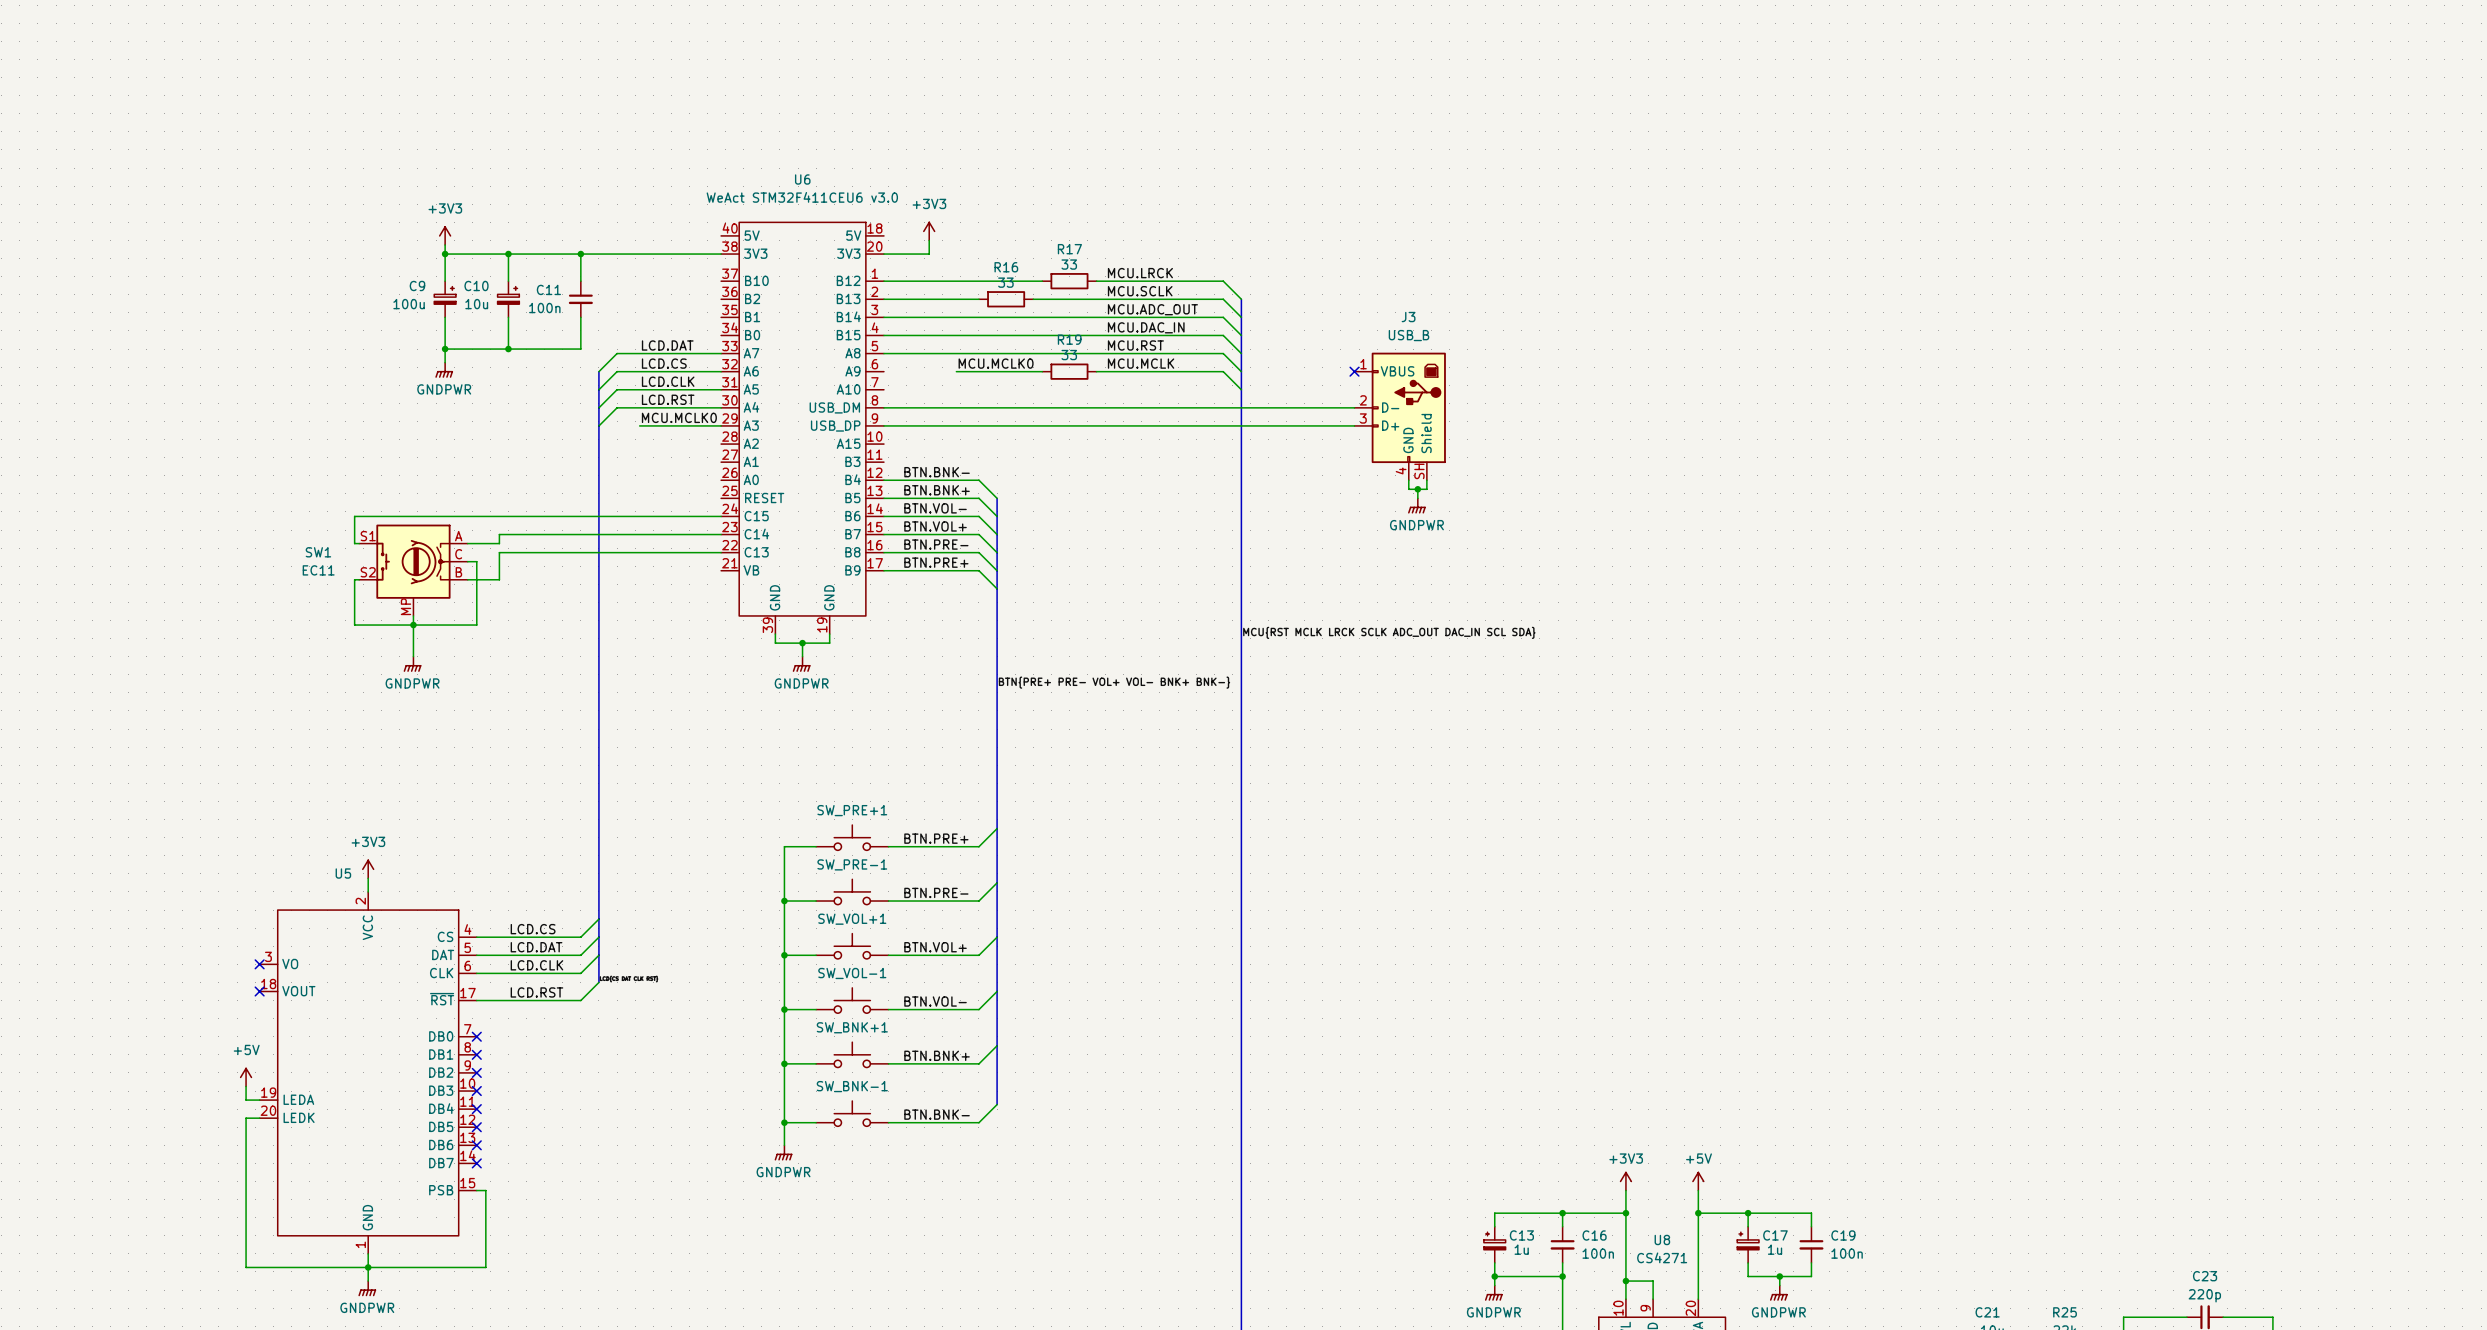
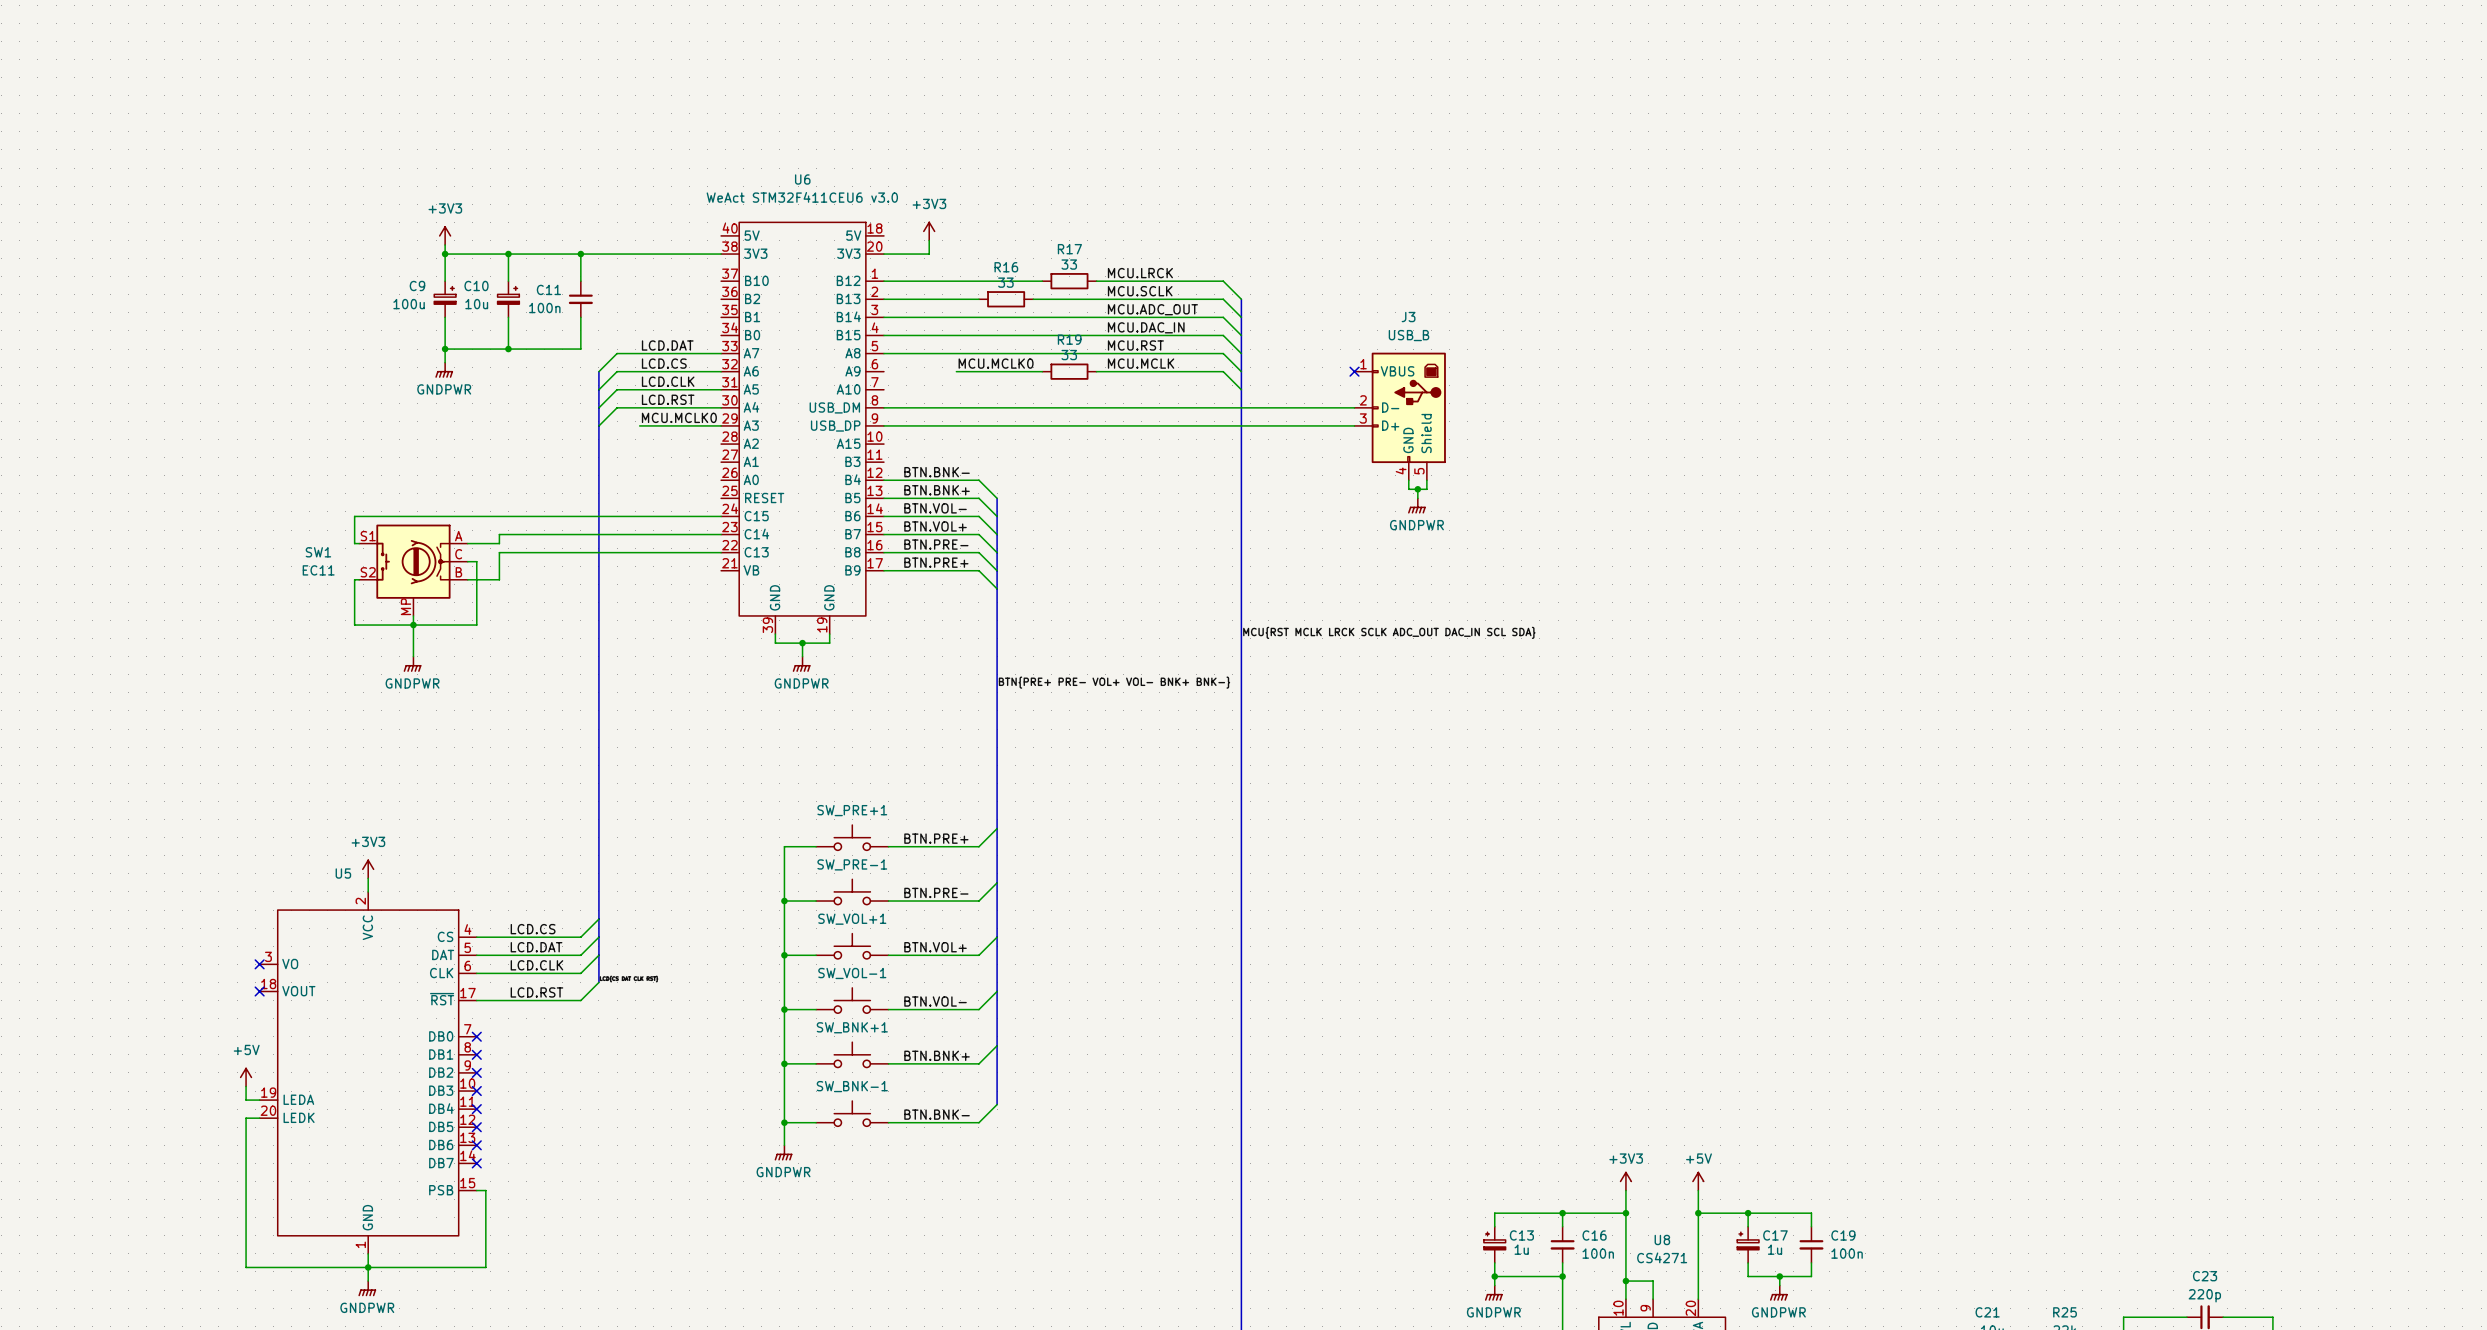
J3 pin number: SH (1419, 471) -> 5 (1419, 471)

